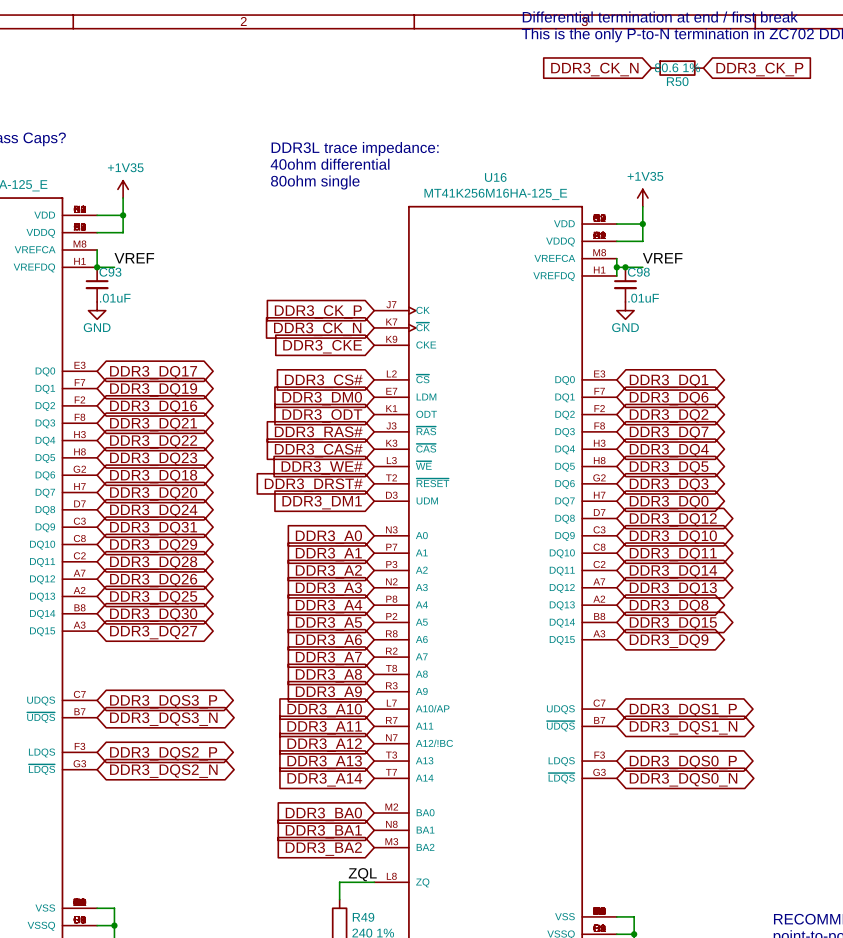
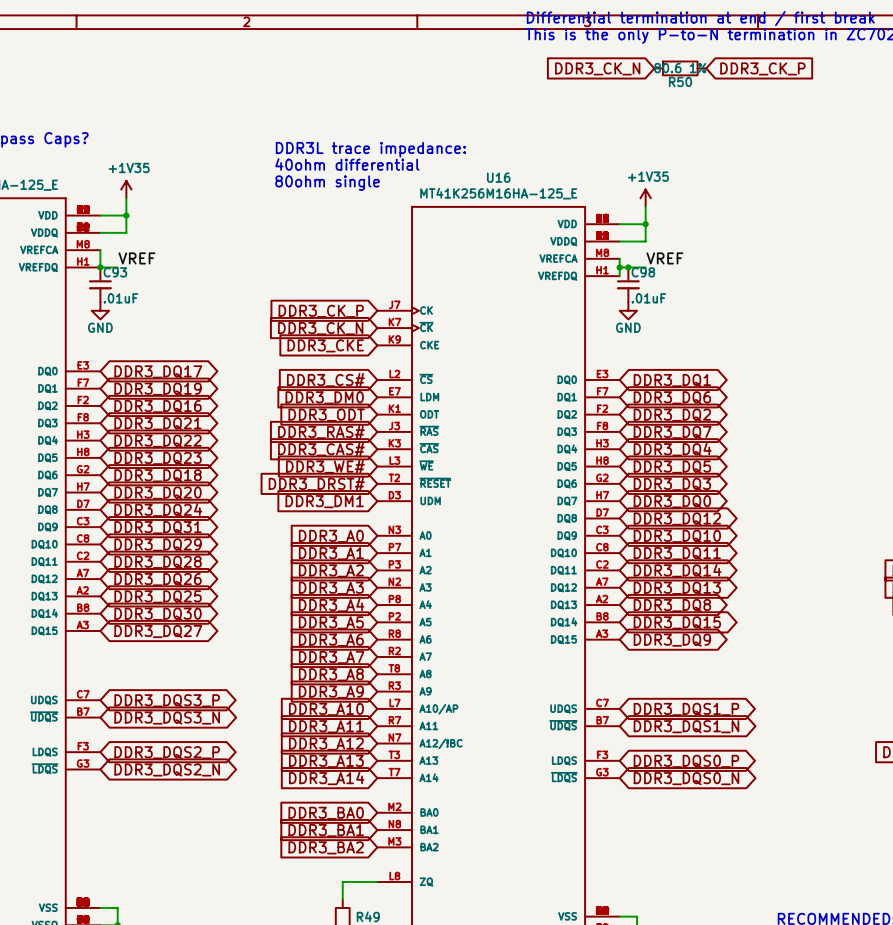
label: ZQL (362, 874) -> none

